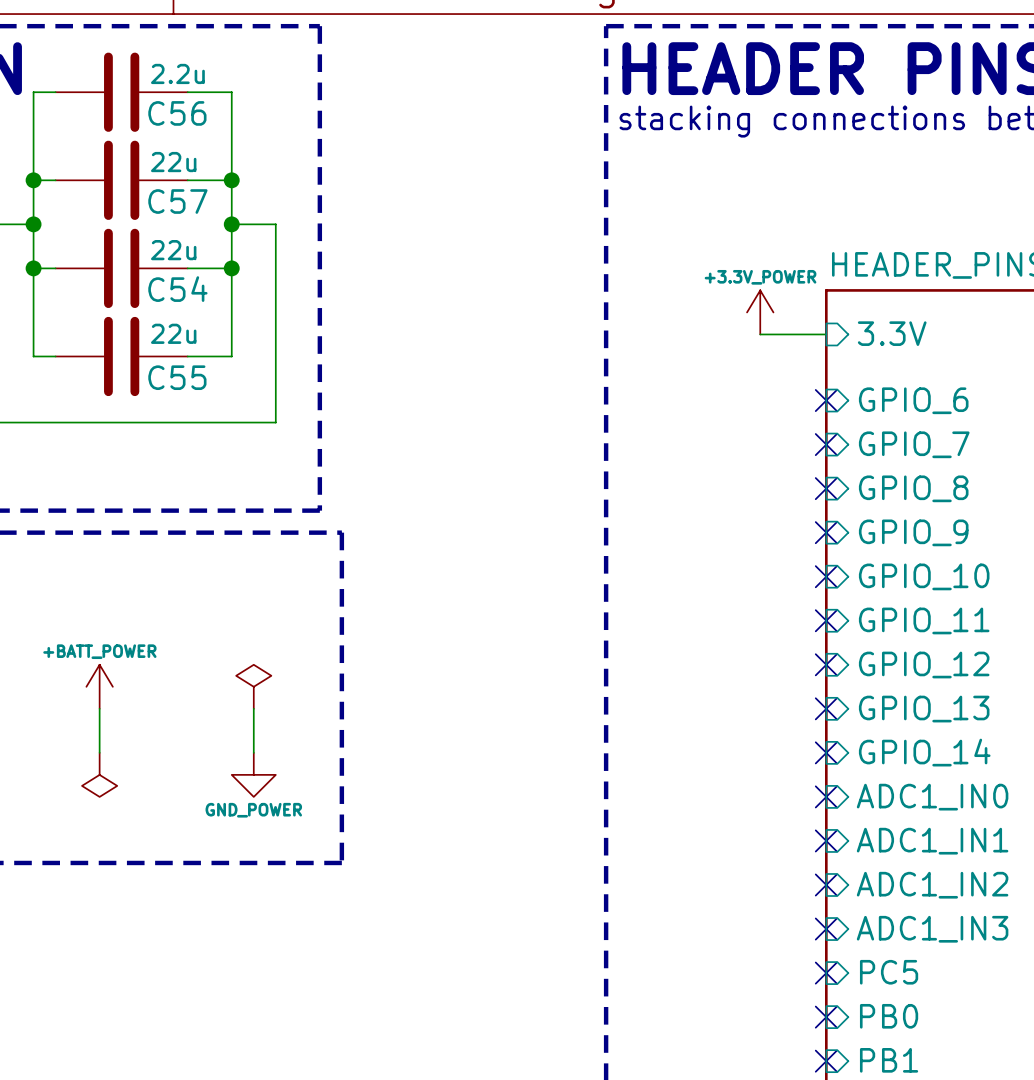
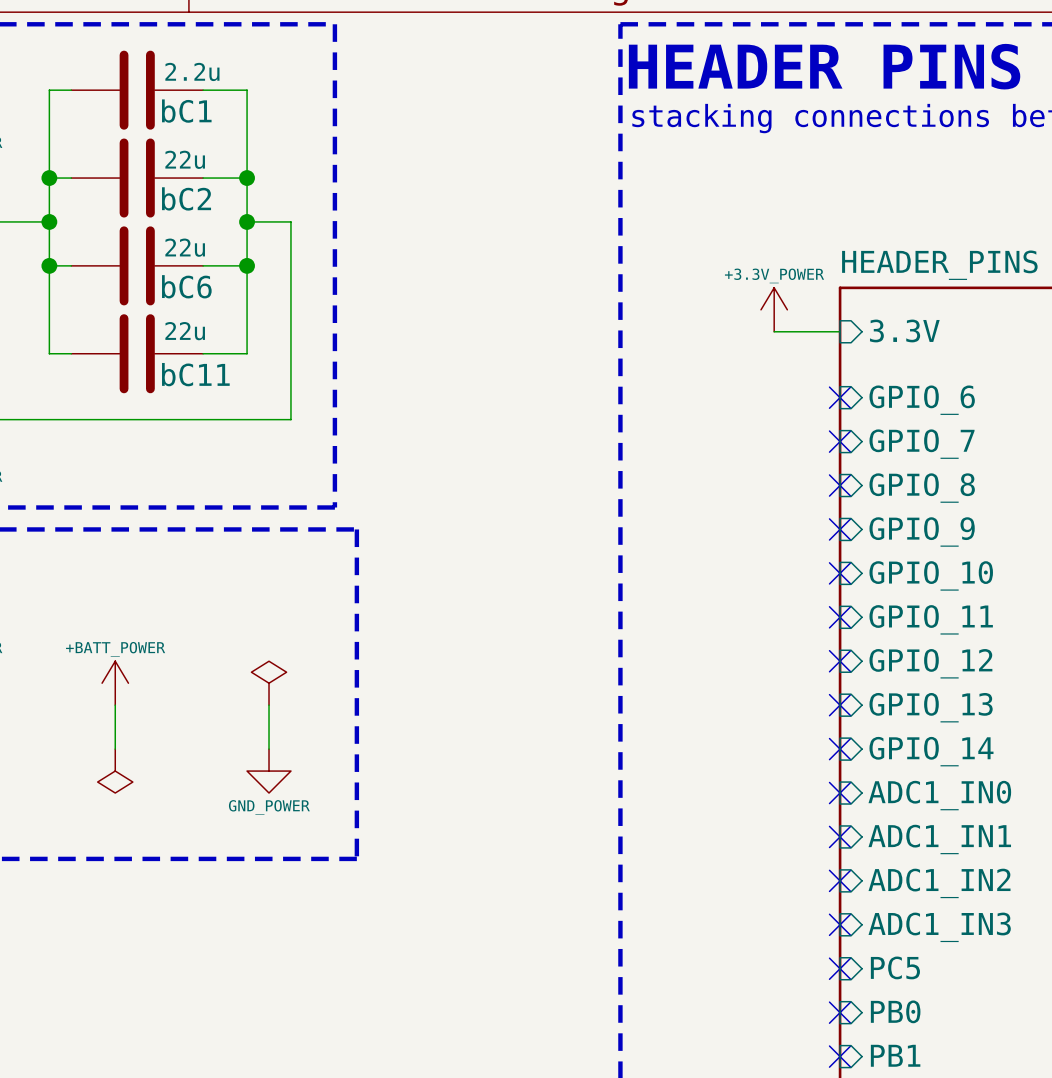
C56 name: C56 (177, 113) -> bC1 (186, 111)
C57 name: C57 (177, 201) -> bC2 (186, 198)
C54 name: C54 (177, 289) -> bC6 (186, 286)
C55 name: C55 (177, 377) -> bC11 (195, 374)

